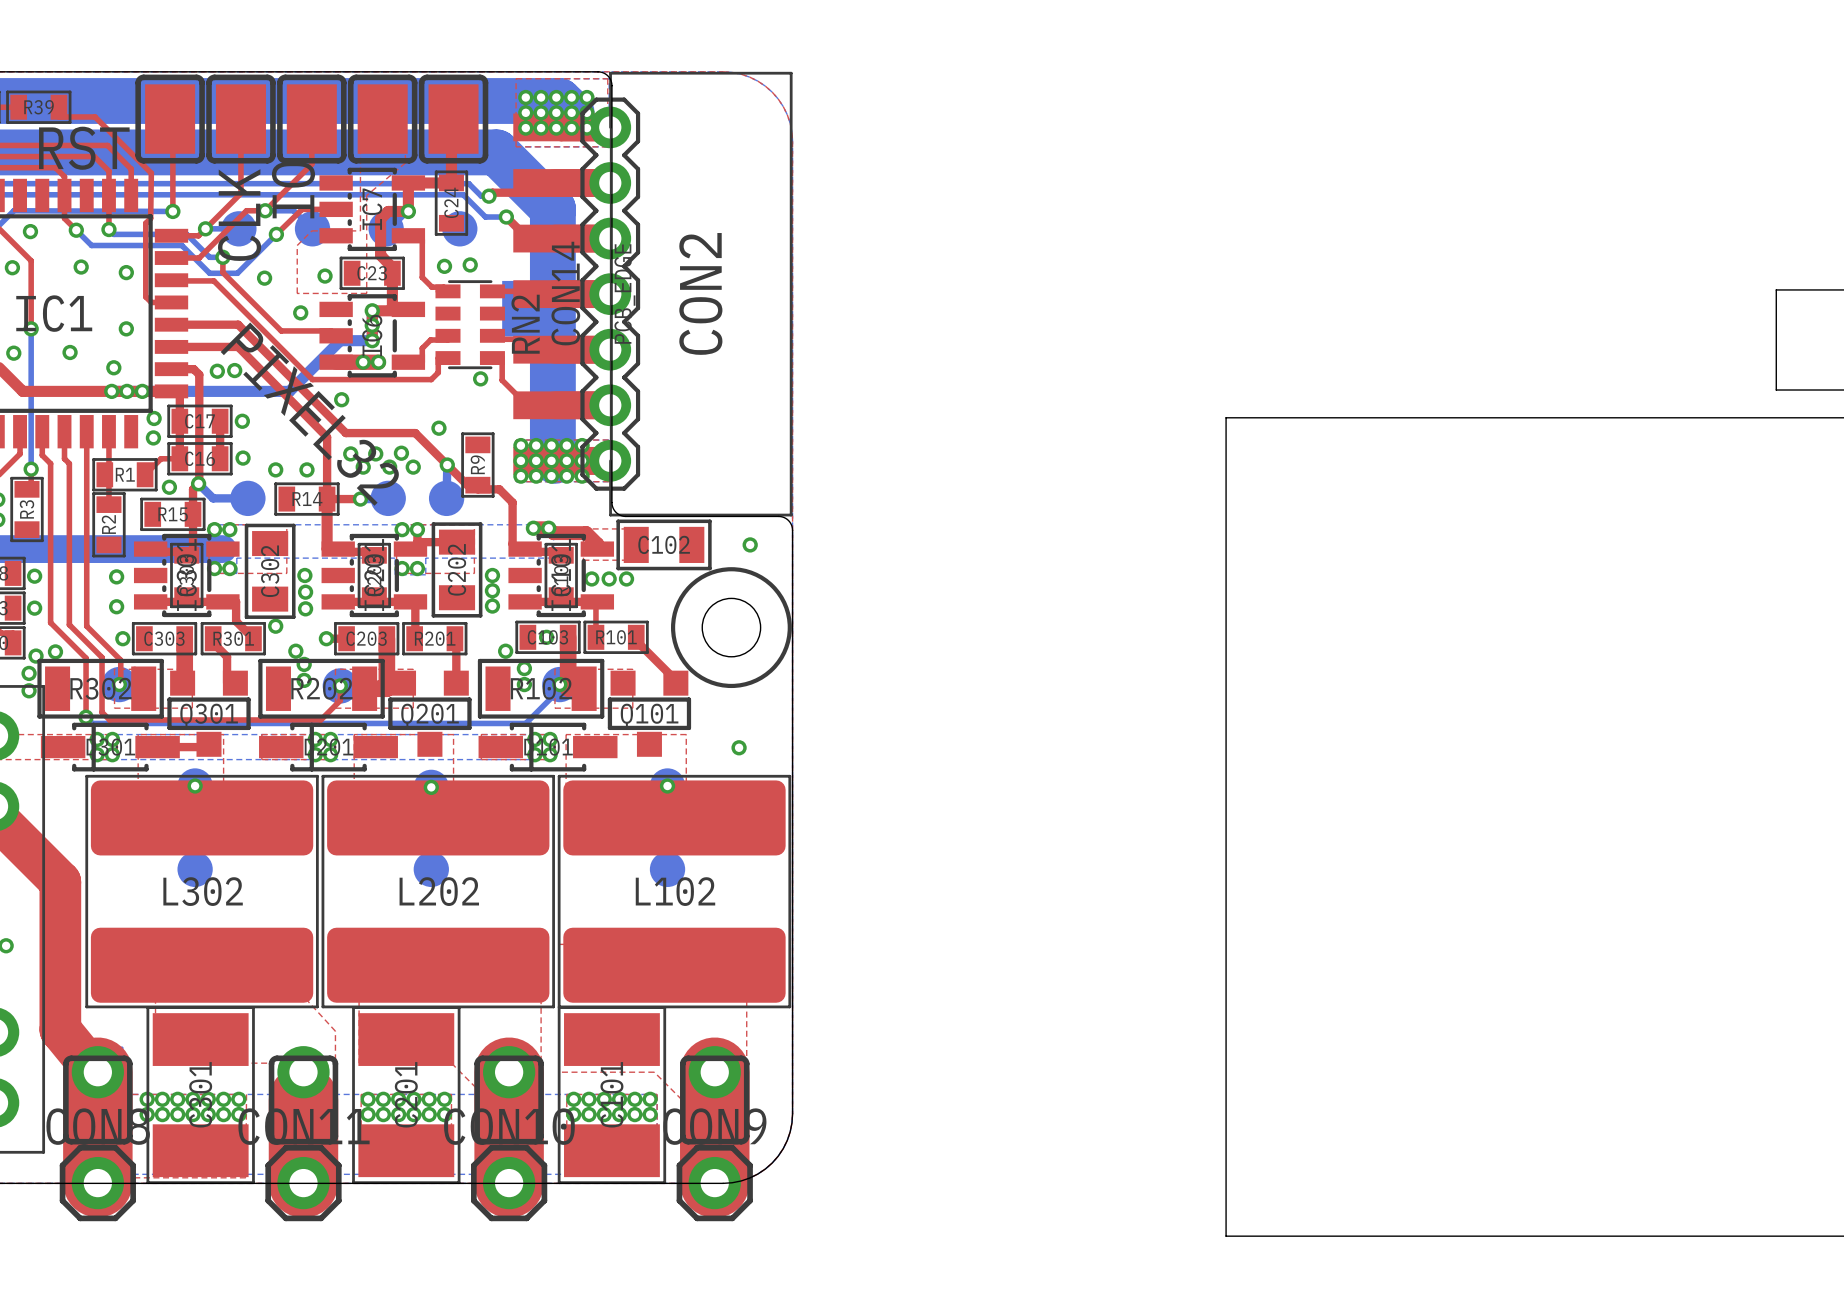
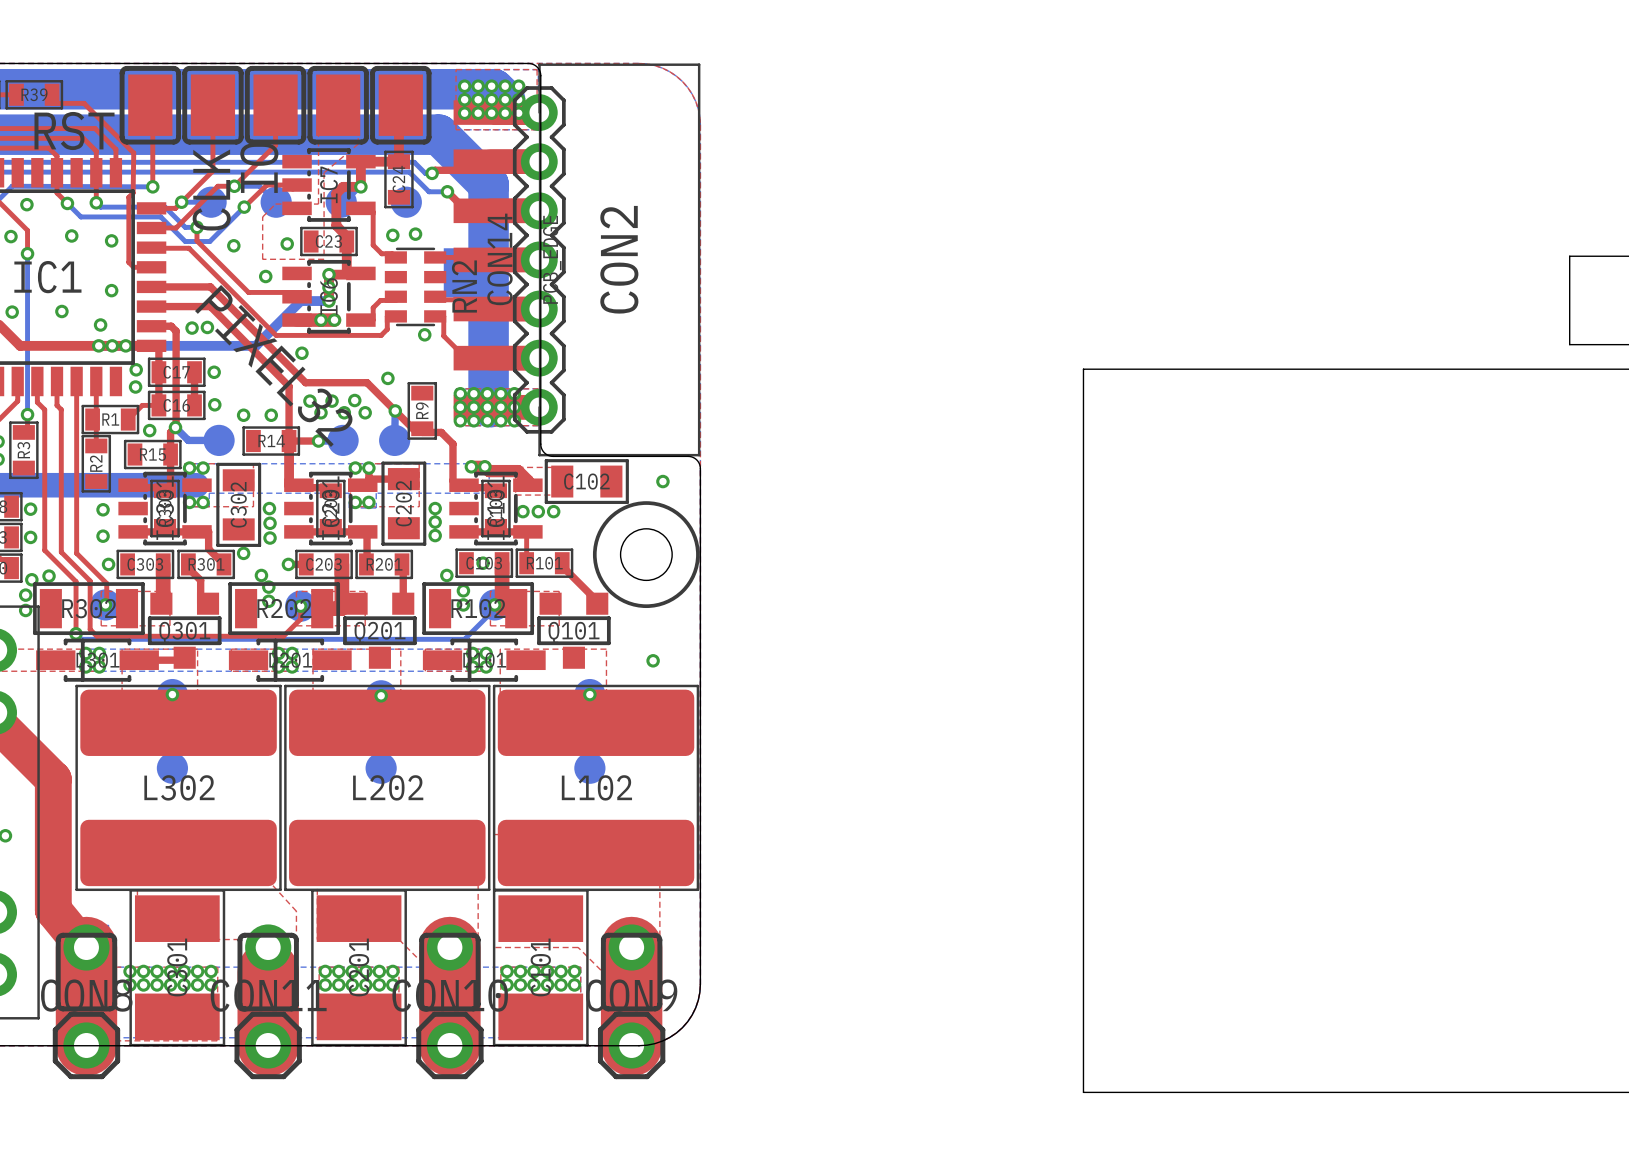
top track: (31, 287) (31, 328) -> none
bottom track: none -> (27, 253) (27, 290)
via position: (31, 328) -> (27, 253)

